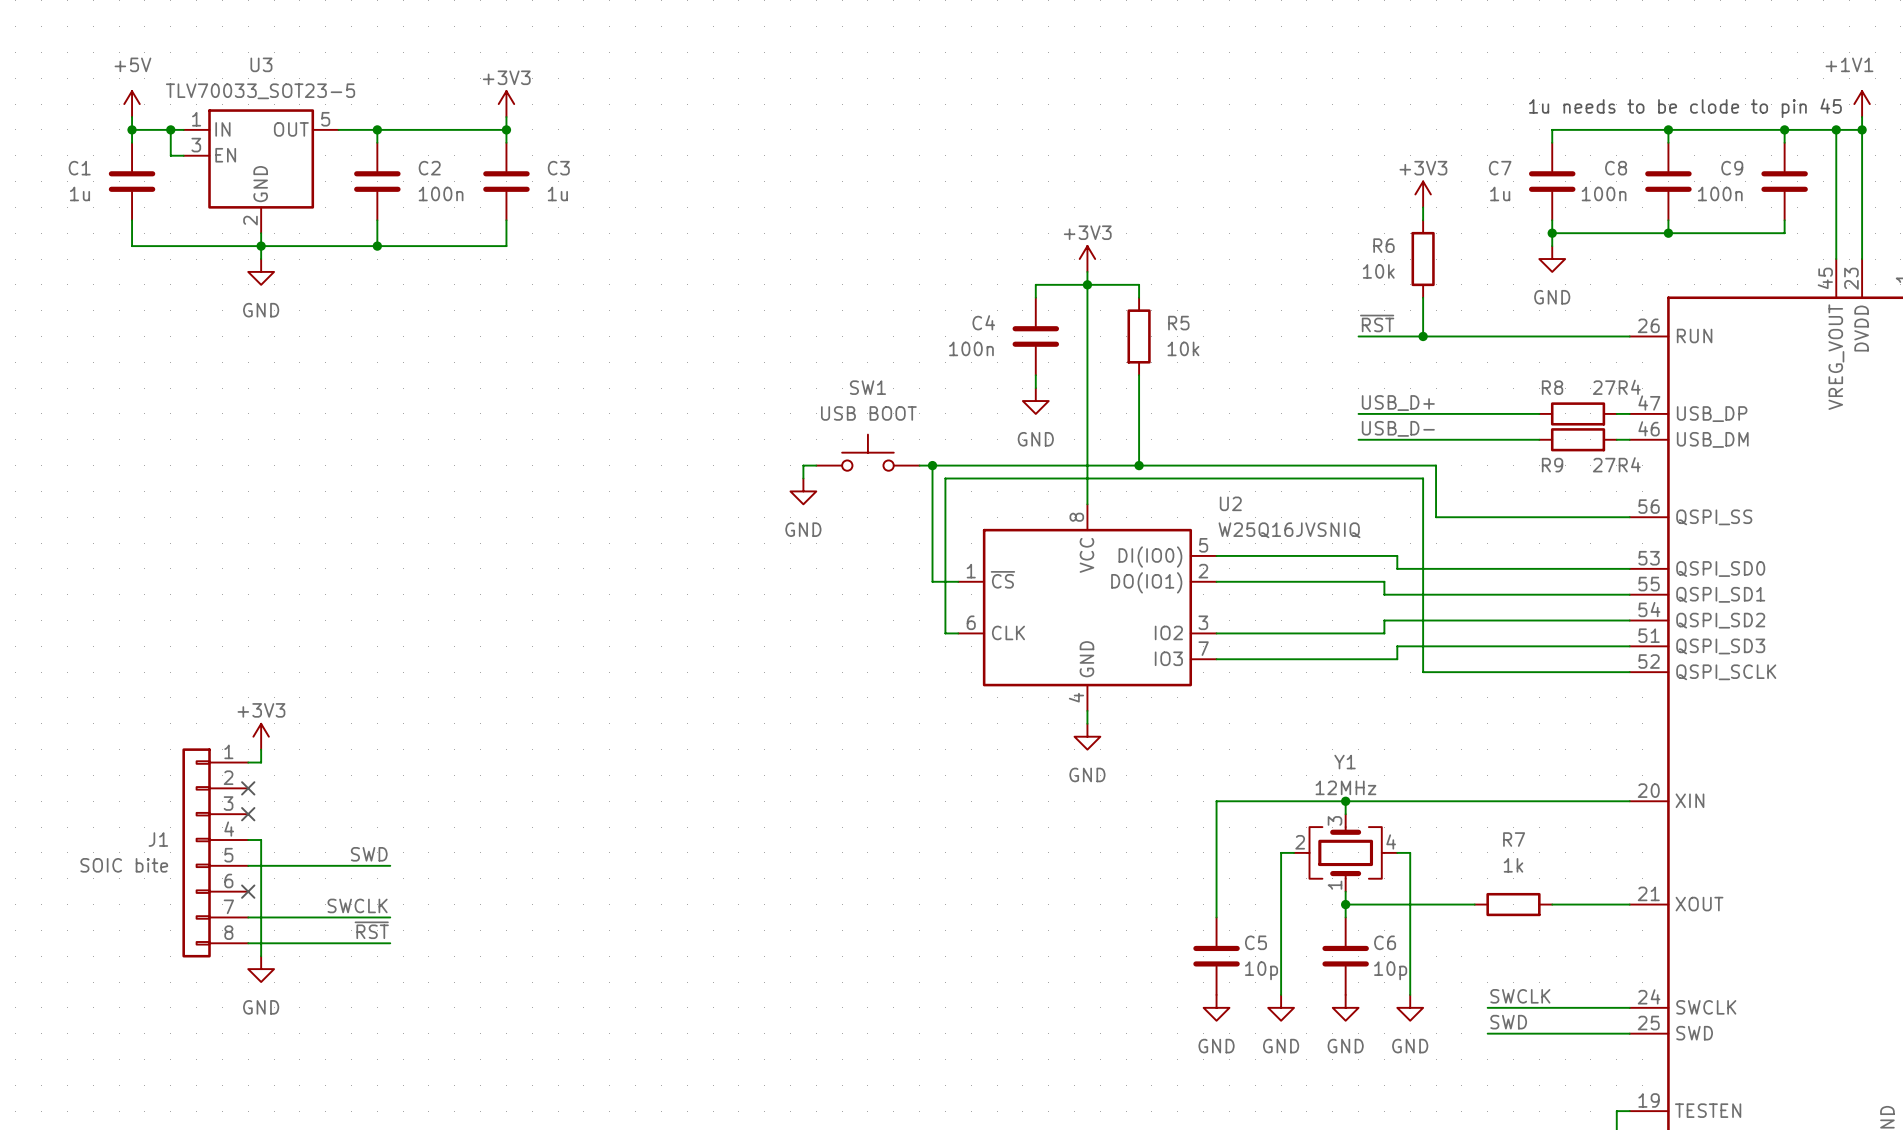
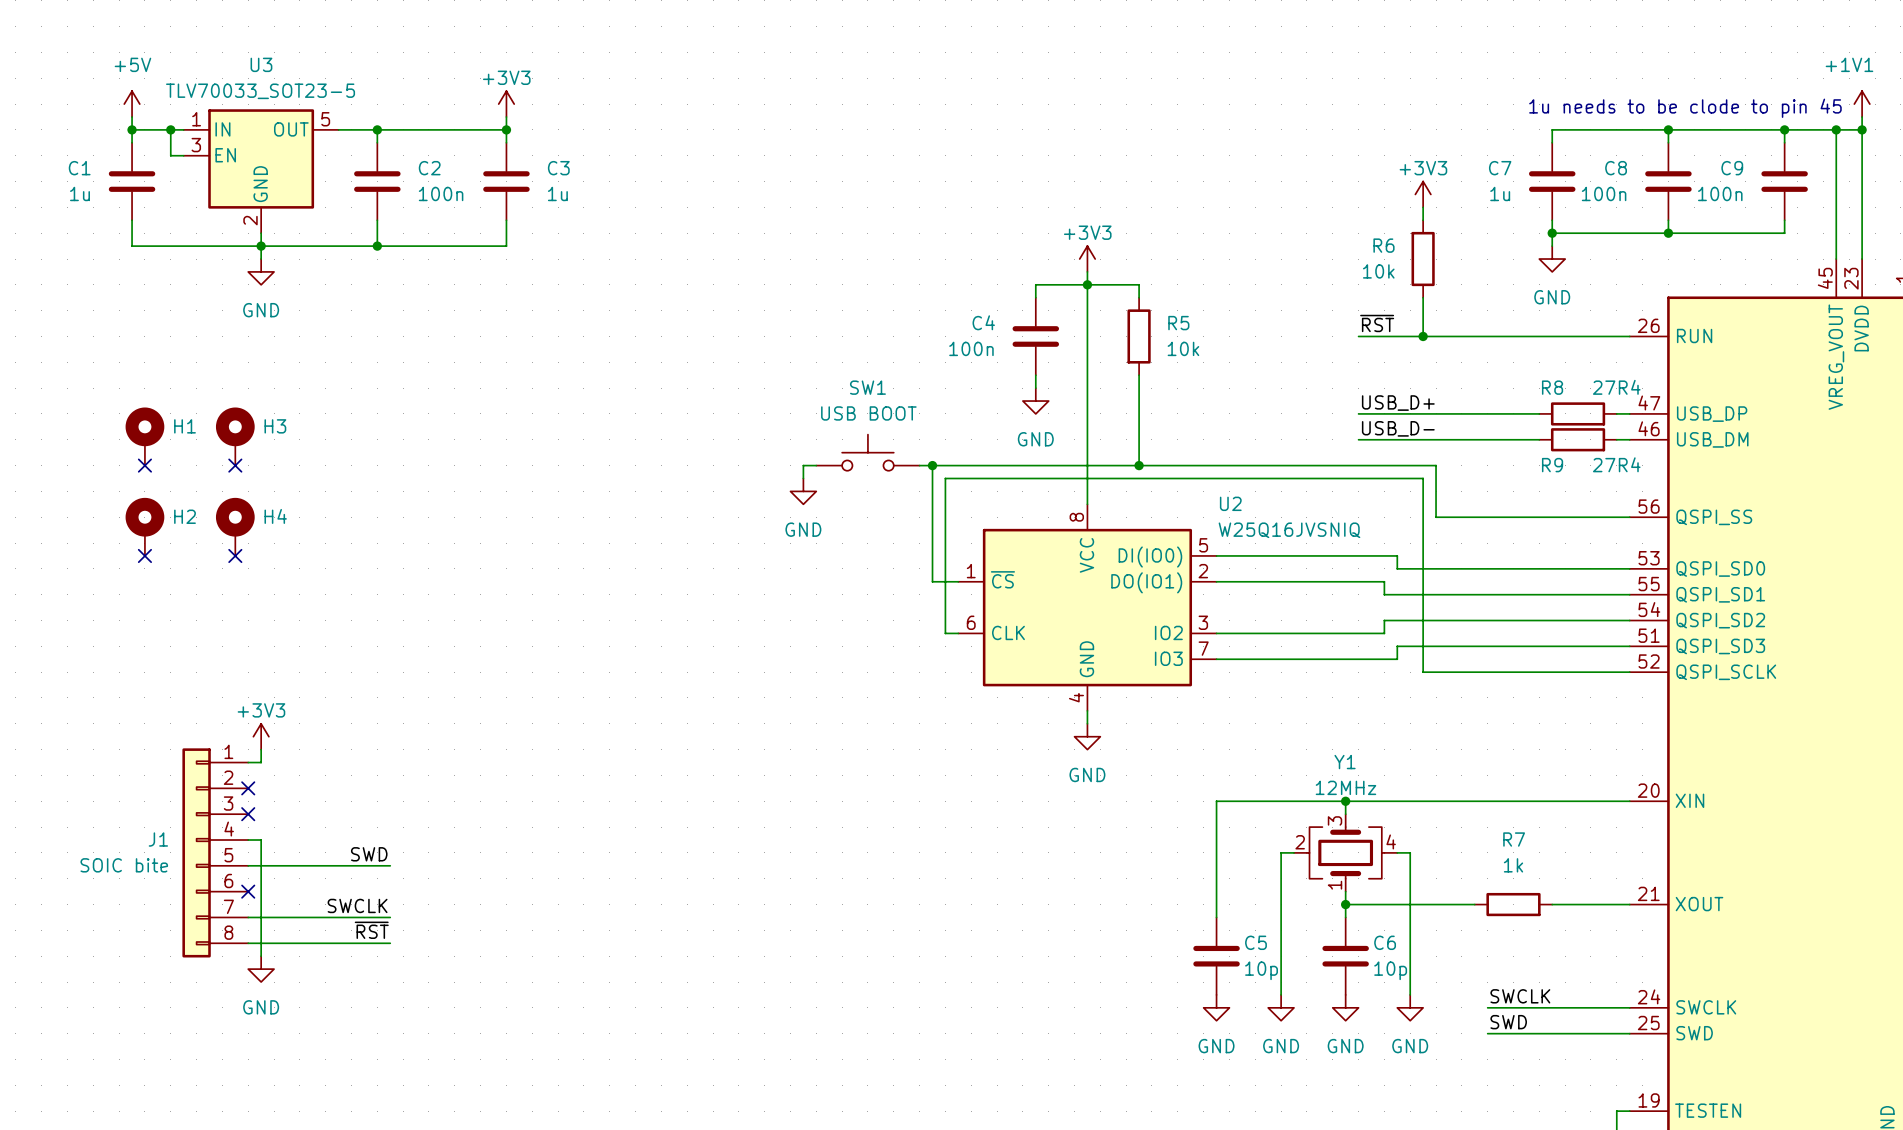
H1: none -> (144, 436)
H3: none -> (235, 436)
no-connect mark: none -> (144, 465)
no-connect mark: none -> (235, 465)
H2: none -> (144, 526)
H4: none -> (235, 526)
no-connect mark: none -> (144, 555)
no-connect mark: none -> (235, 555)

